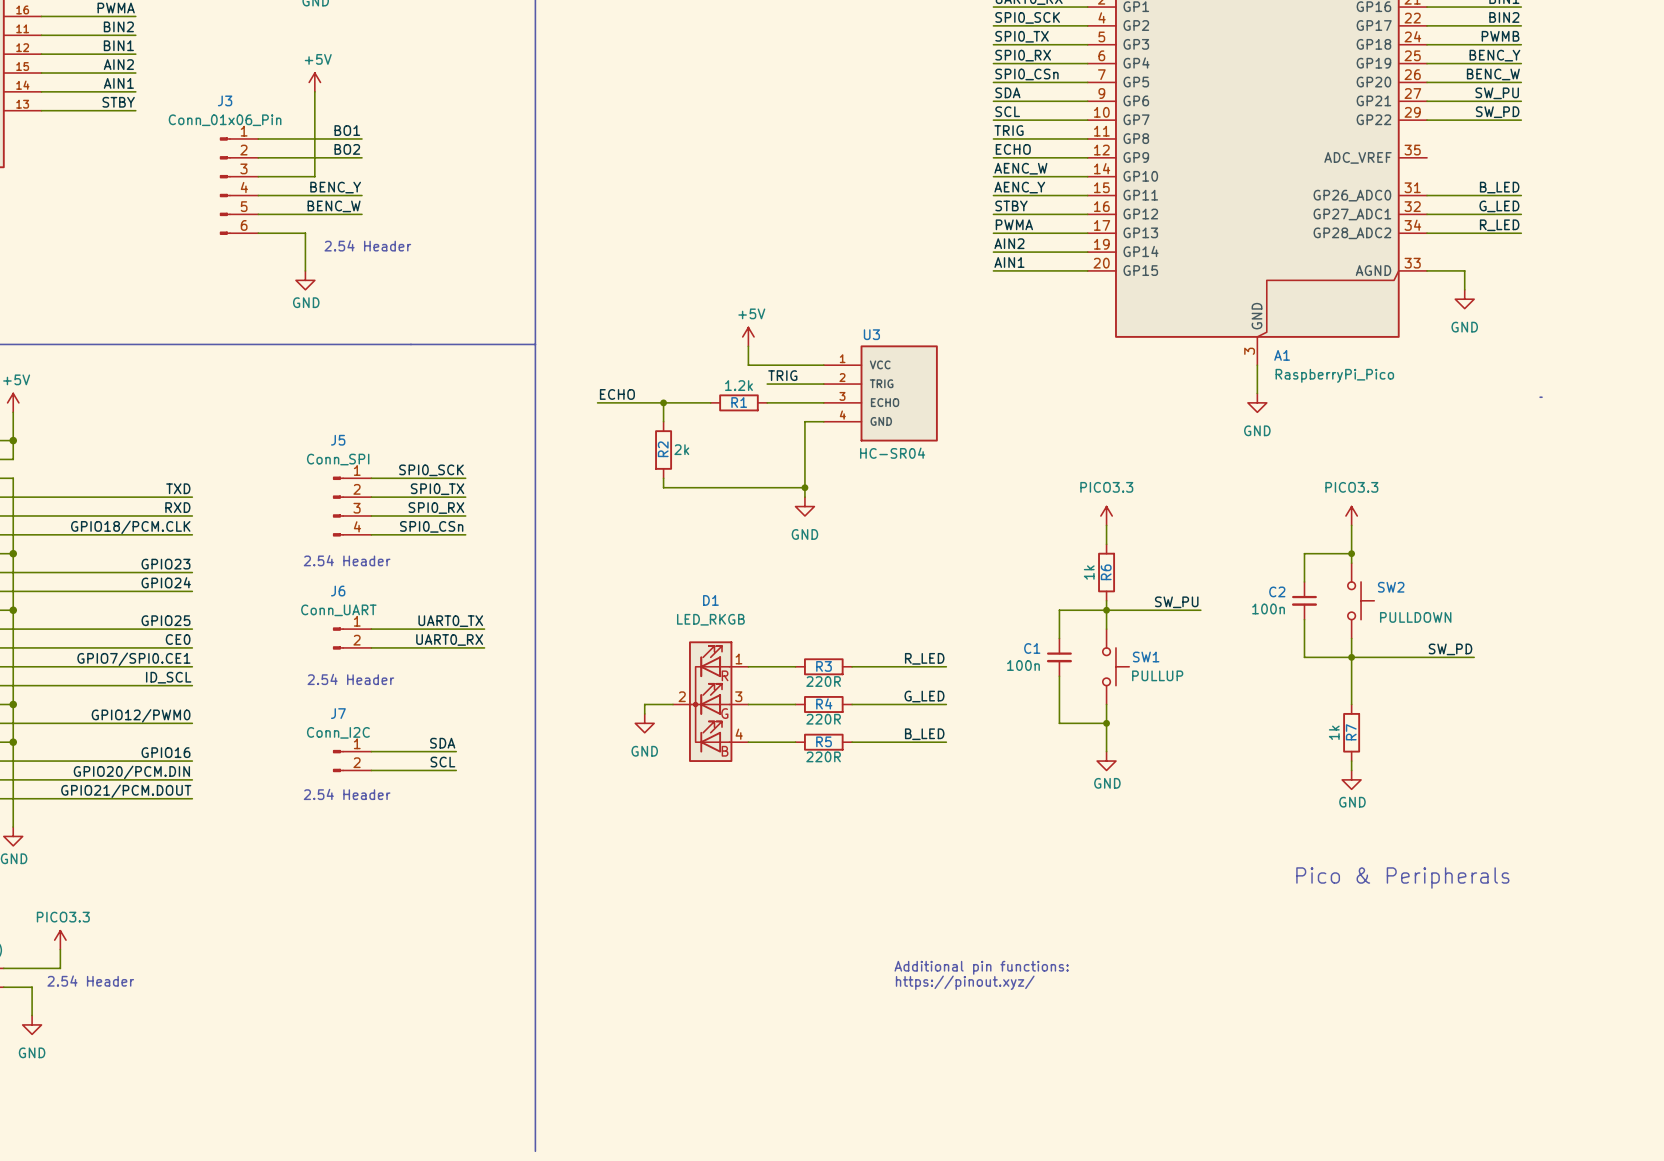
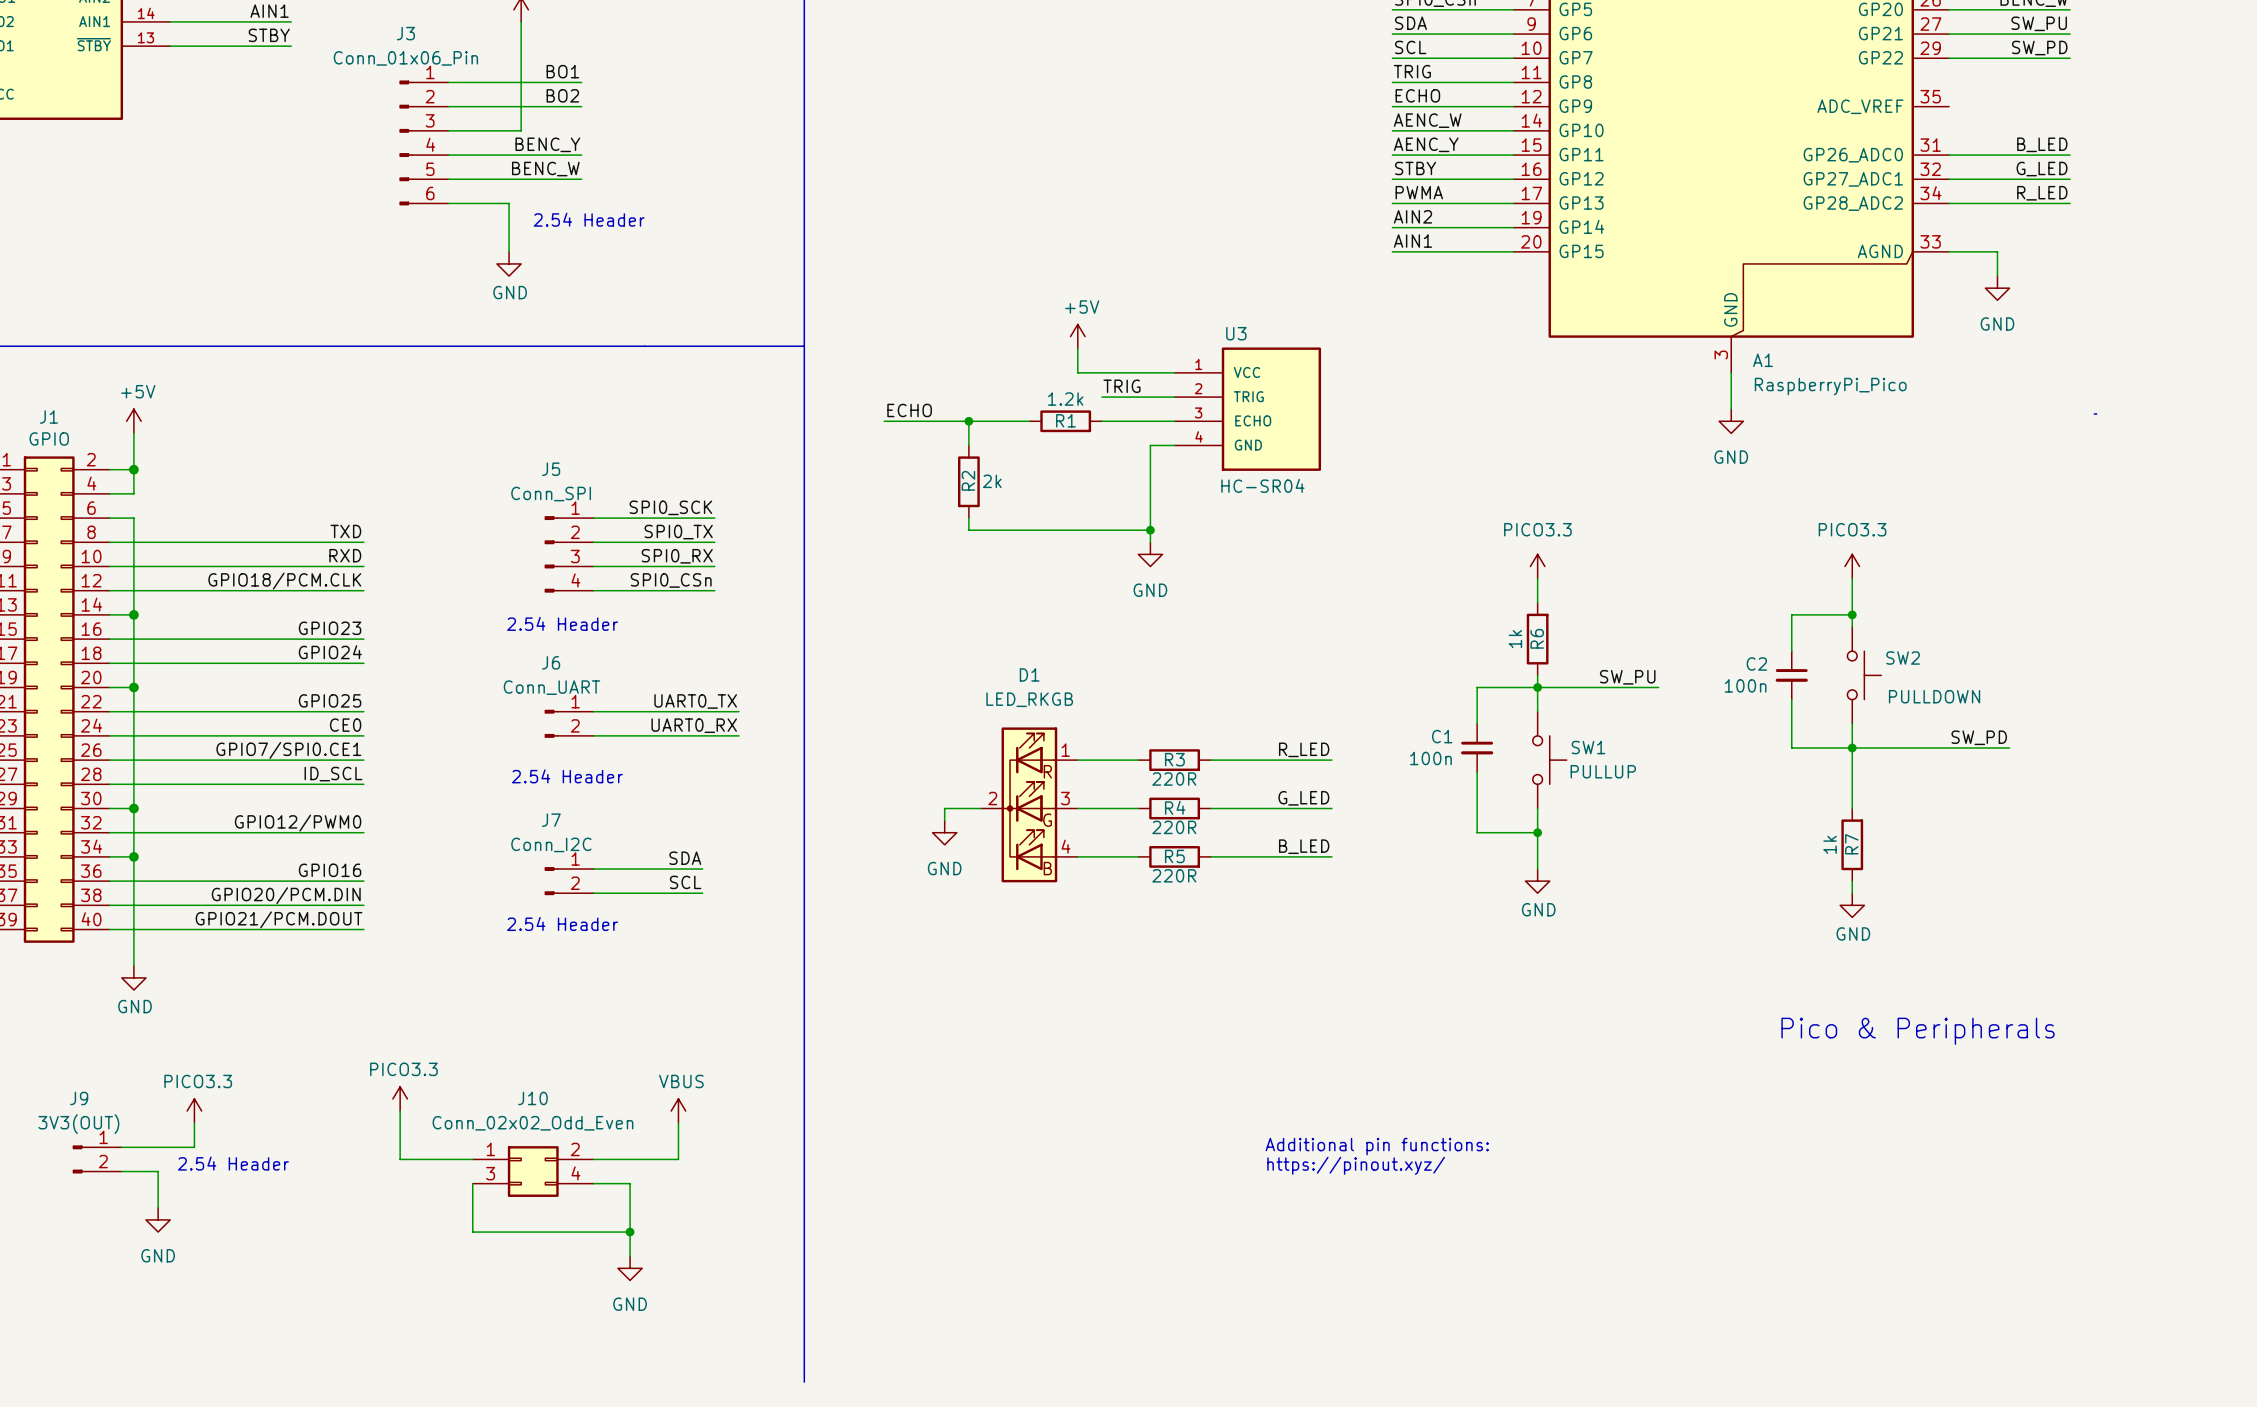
power symbol: none -> PICO3.3 (400, 1098)
wire: none -> (400, 1111) (400, 1159) (472, 1159)
power symbol: none -> VBUS (678, 1111)
wire: none -> (678, 1123) (678, 1159) (593, 1159)
J10: none -> Conn_02x02_Odd_Even (533, 1171)
wire: none -> (472, 1183) (472, 1232) (630, 1232)
wire: none -> (593, 1183) (630, 1183) (630, 1256)
junction: none -> (630, 1232)
power symbol: none -> GND (630, 1268)

